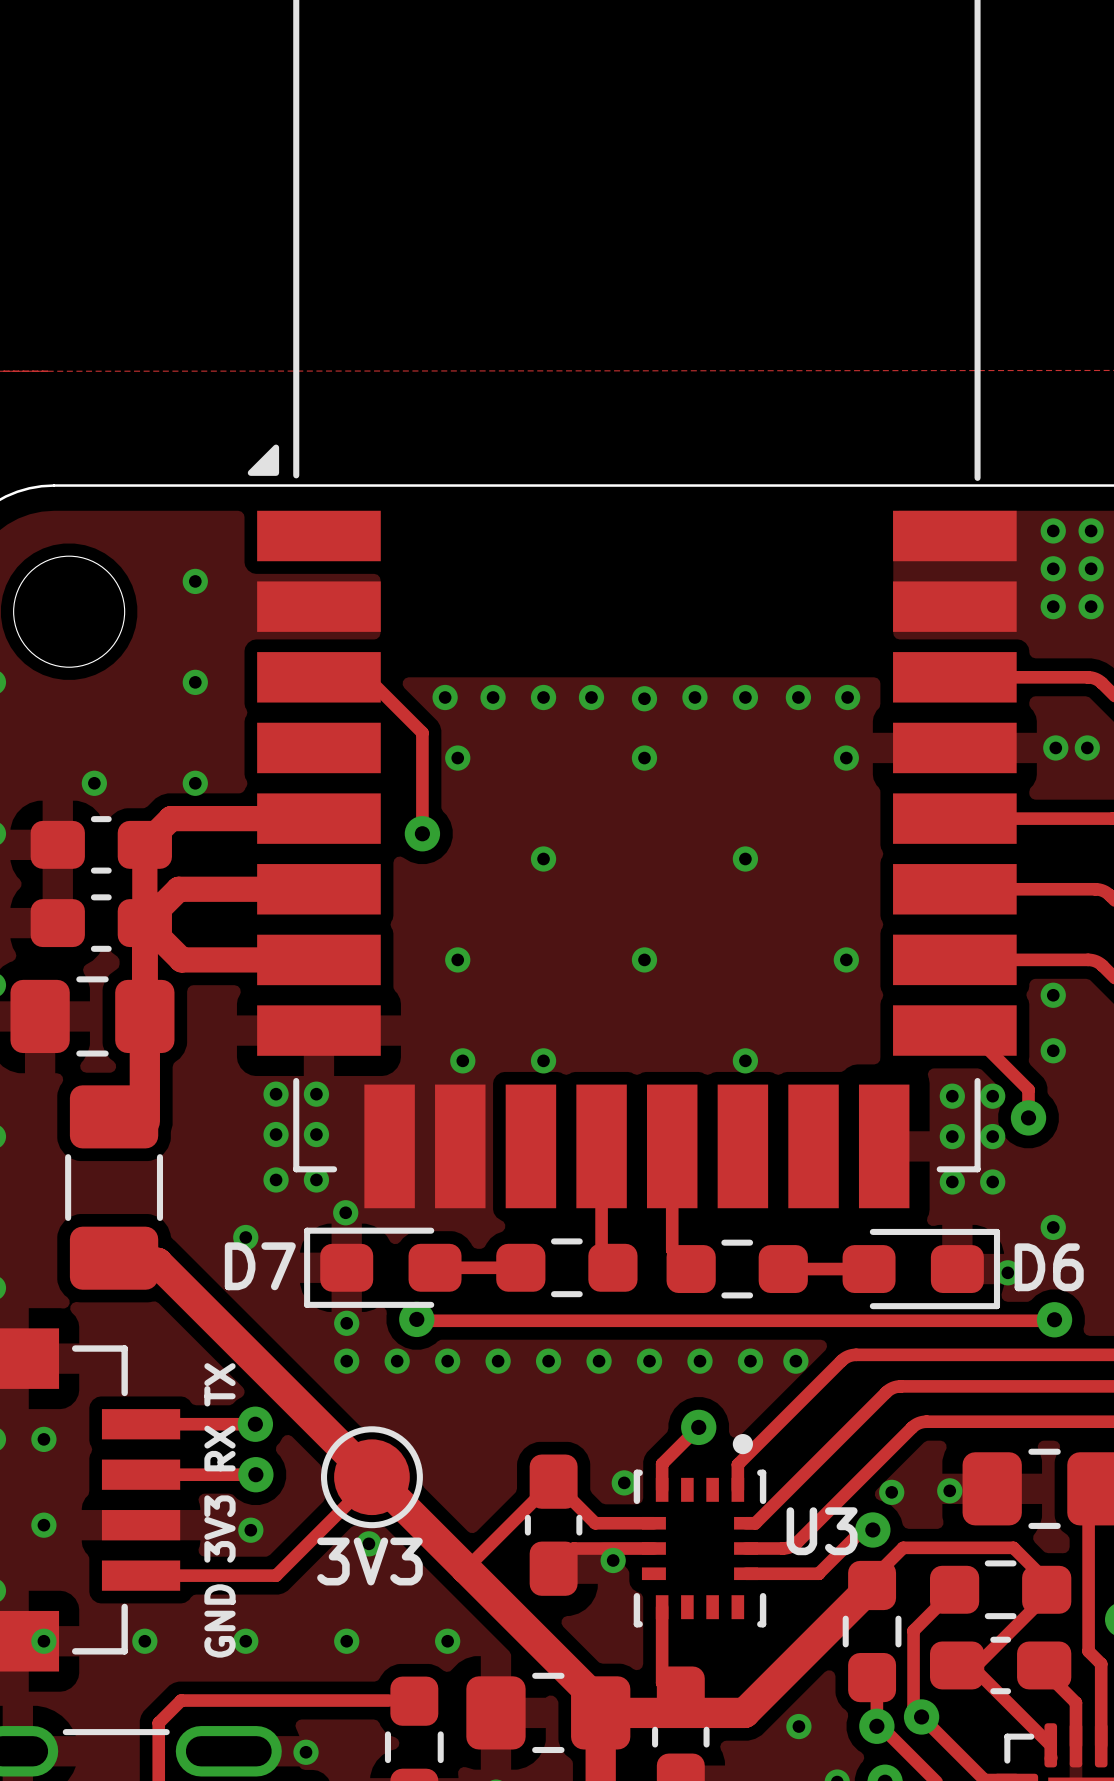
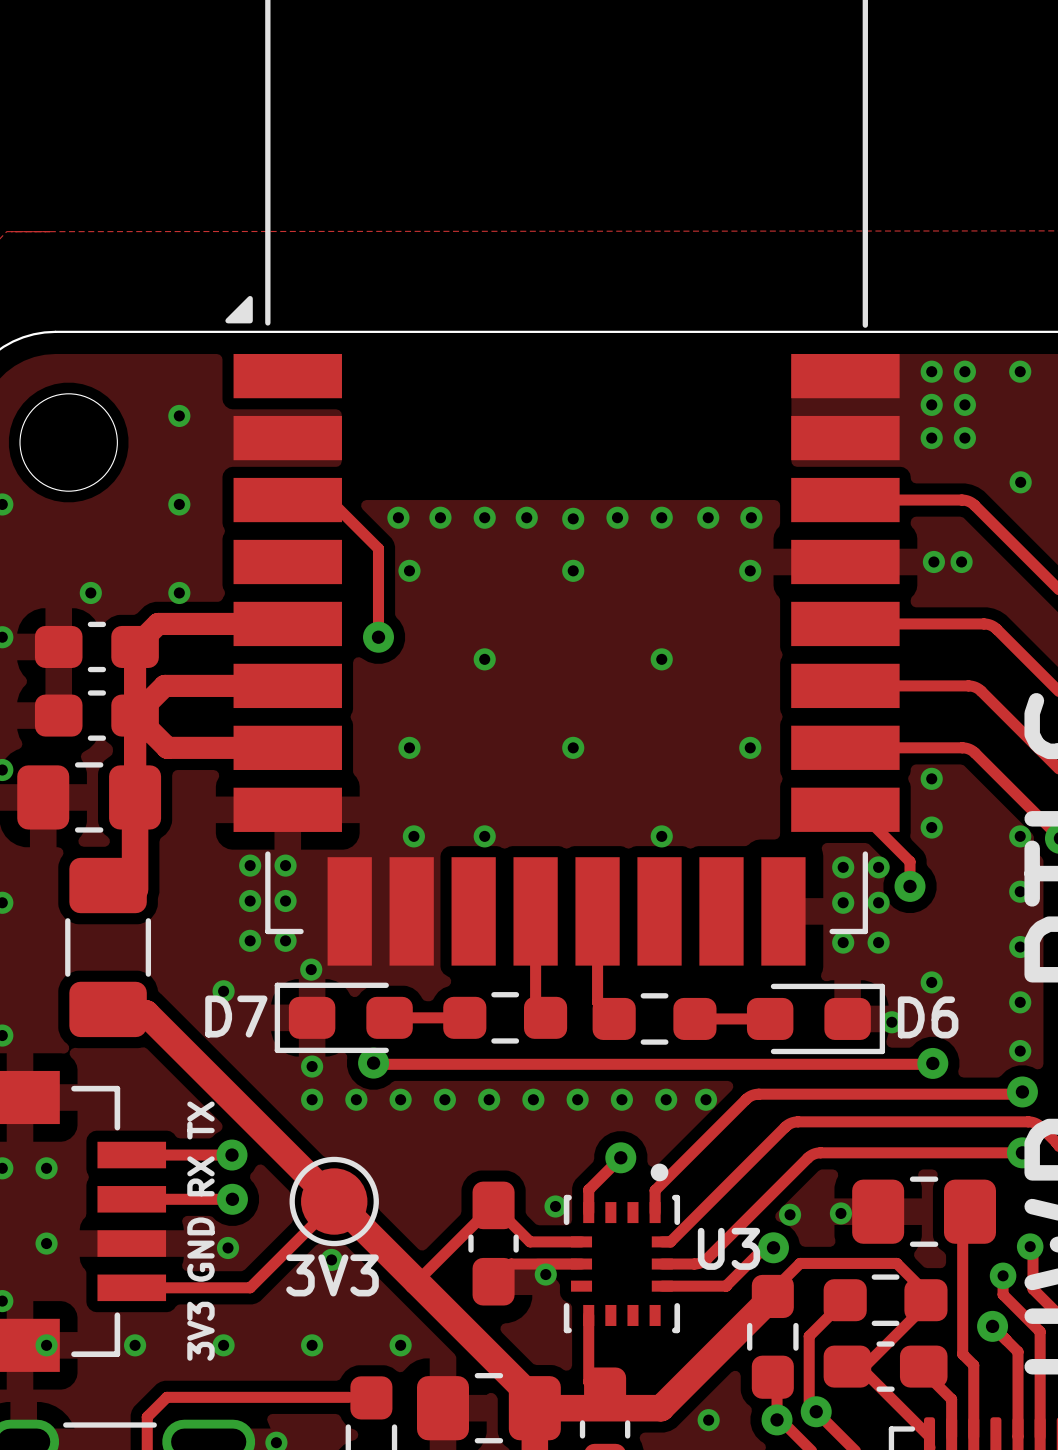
text: GND 3V3 RX TX (219, 1510) -> 3V3 GND RX TX (200, 1231)

